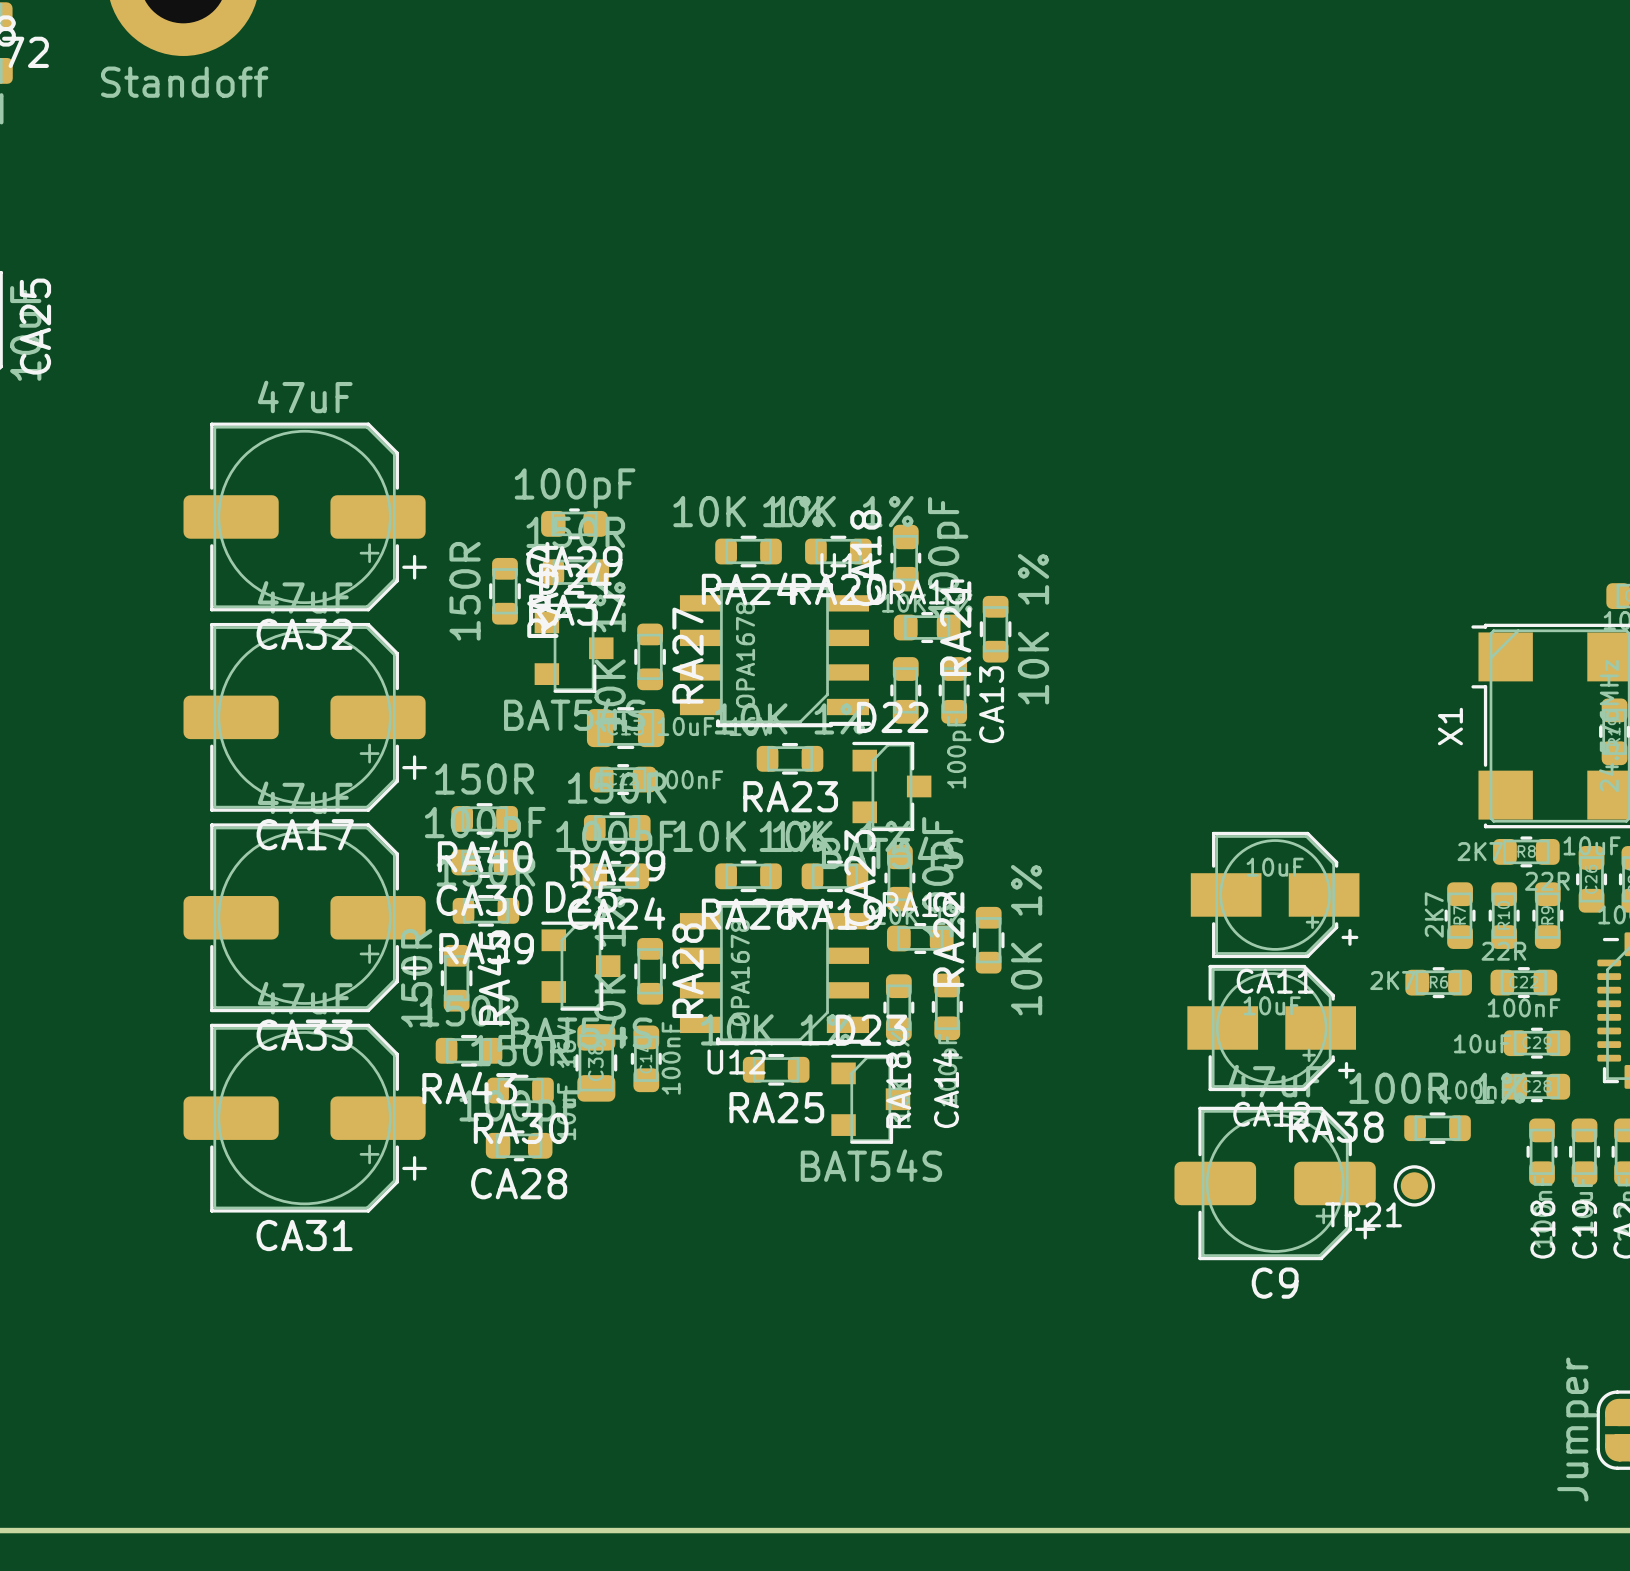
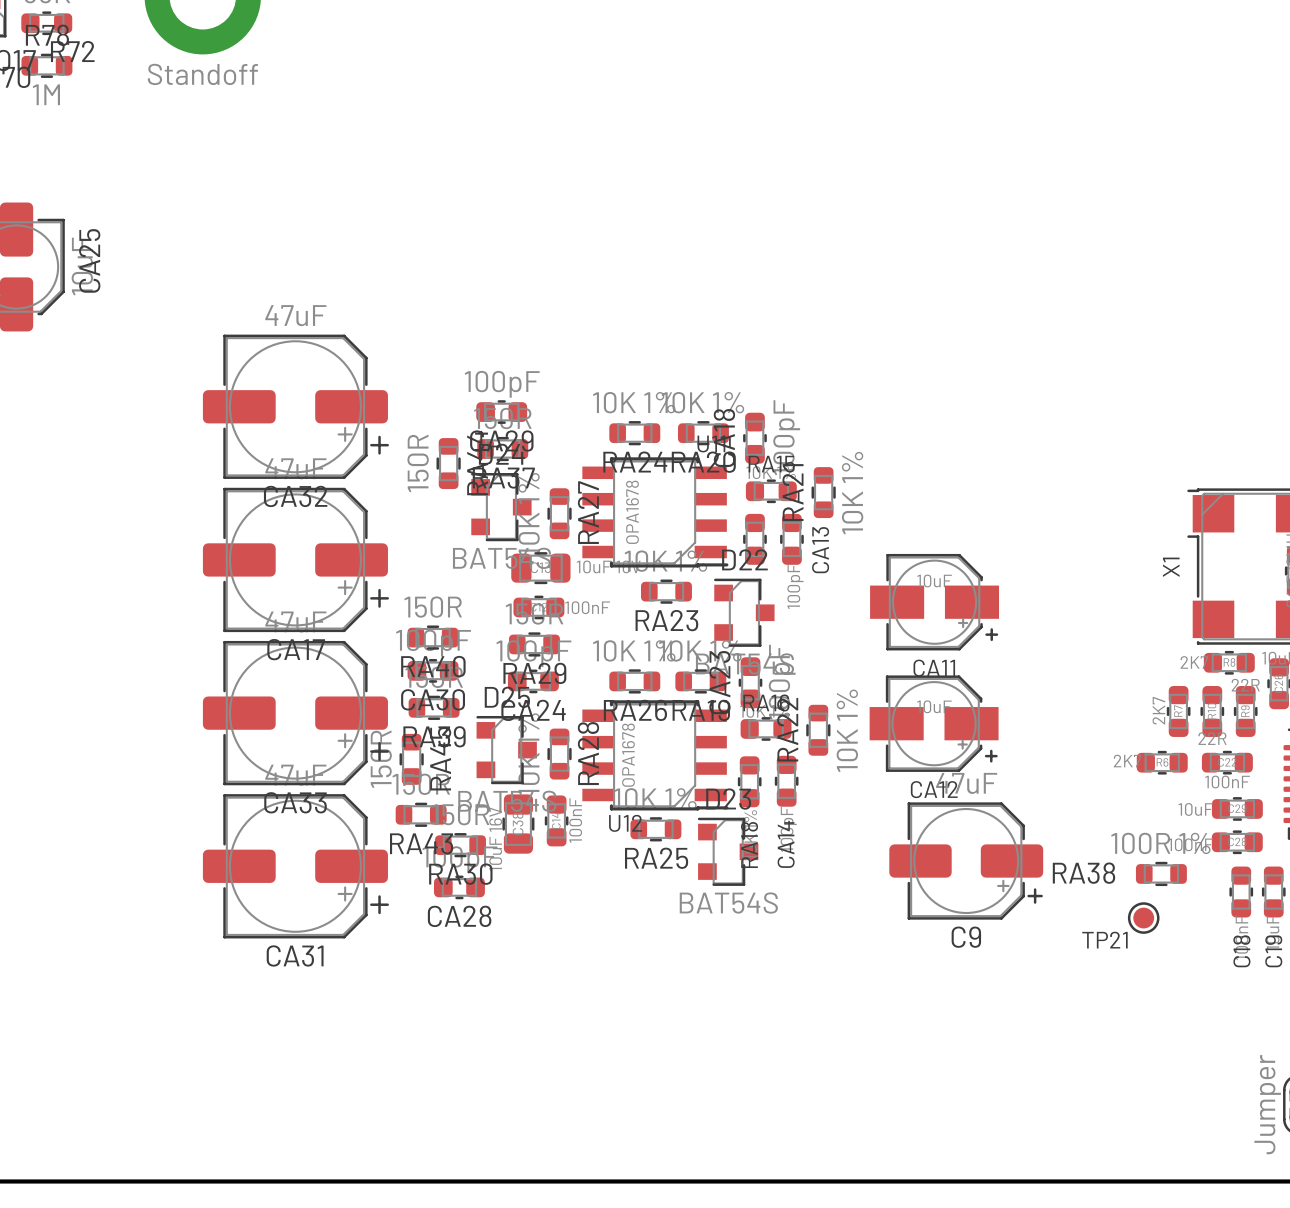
CA11 position: (1275, 894) -> (934, 602)
CA12 position: (1271, 1027) -> (934, 723)
C9 position: (1275, 1183) -> (966, 861)

